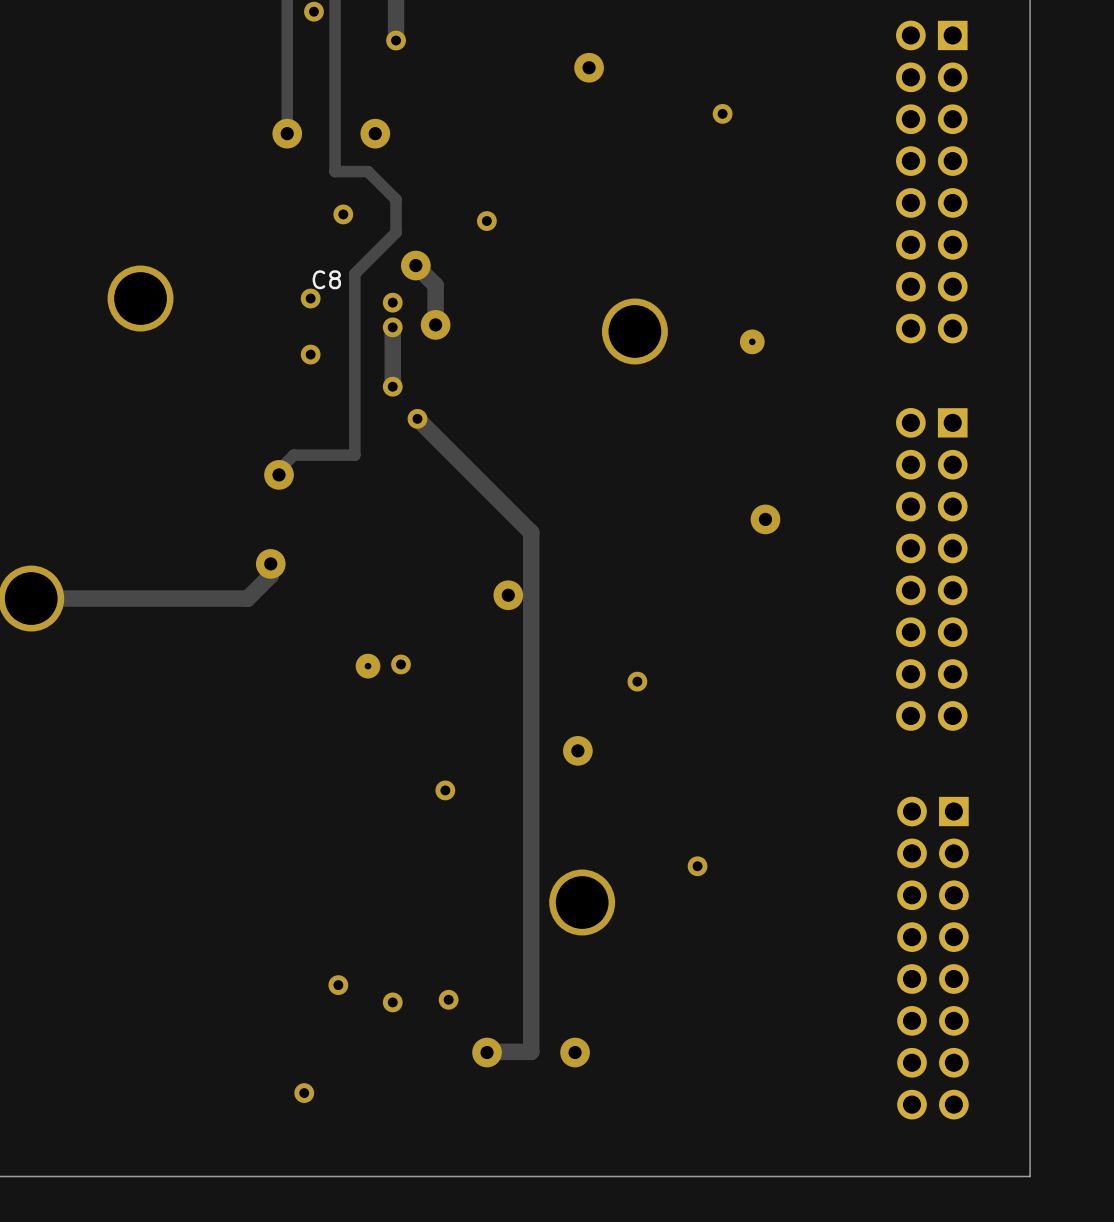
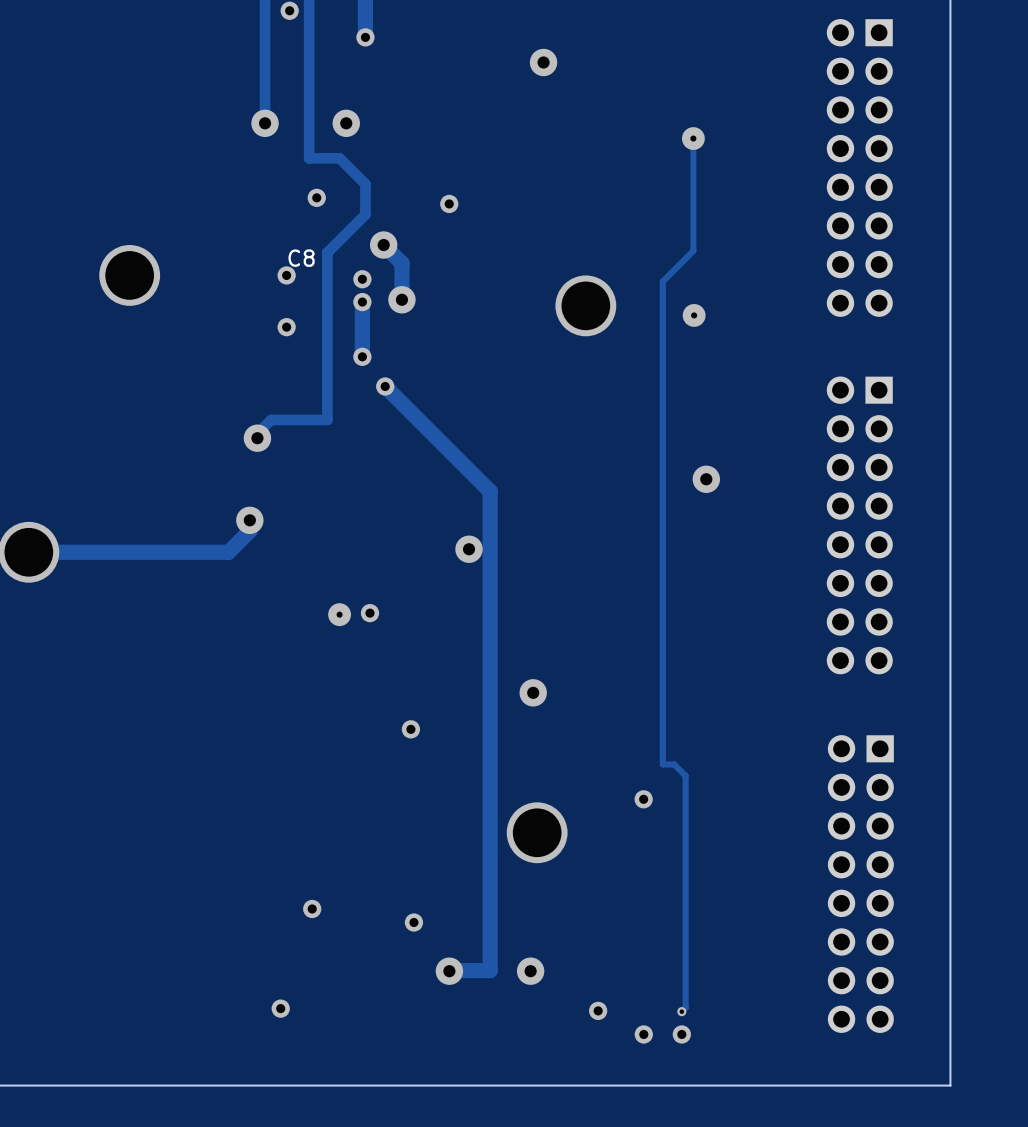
via: (722, 113) -> none
track: none -> (693, 138) (693, 250) (662, 281) (662, 764) (674, 764) (685, 775) (685, 1007) (681, 1011)
via: none -> (693, 138)
via: (637, 681) -> none
via: (392, 1002) -> none
via: none -> (598, 1010)
via: none -> (681, 1011)
via: none -> (643, 1034)
via: none -> (681, 1034)

